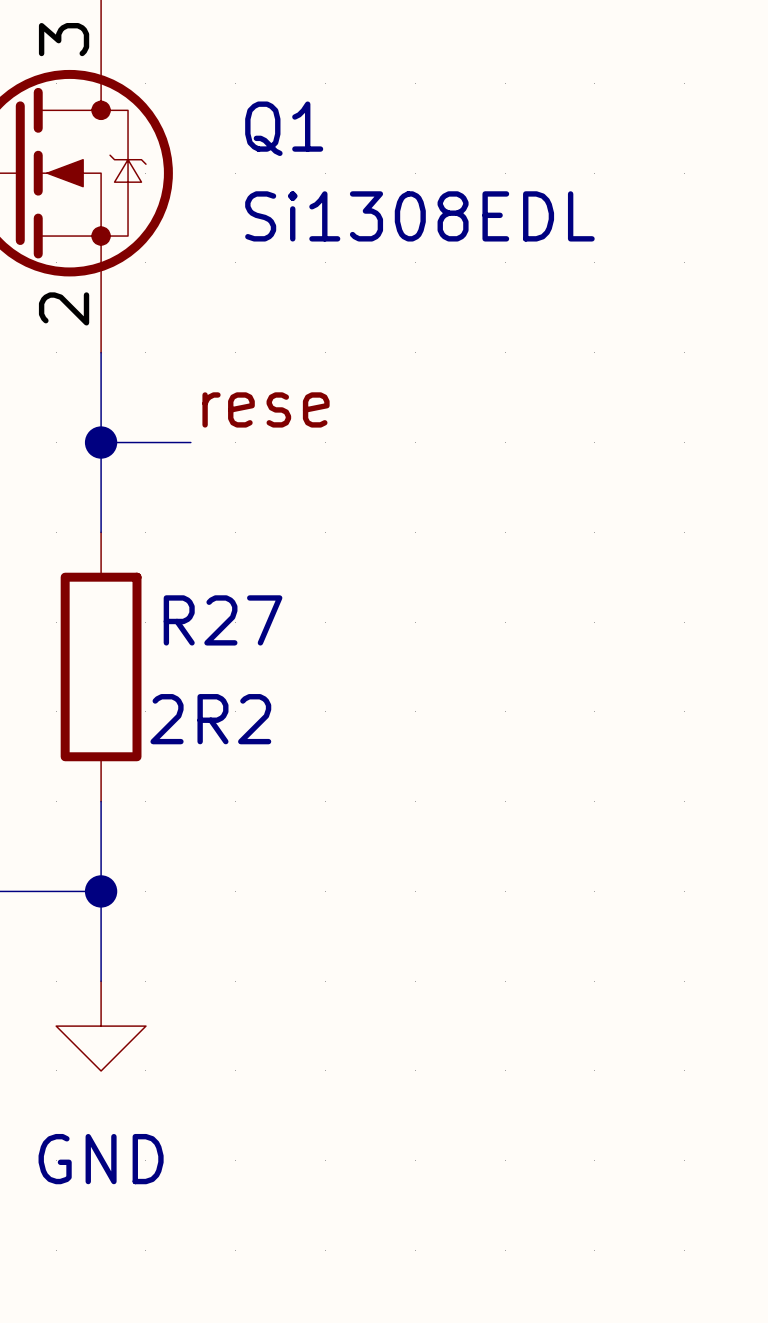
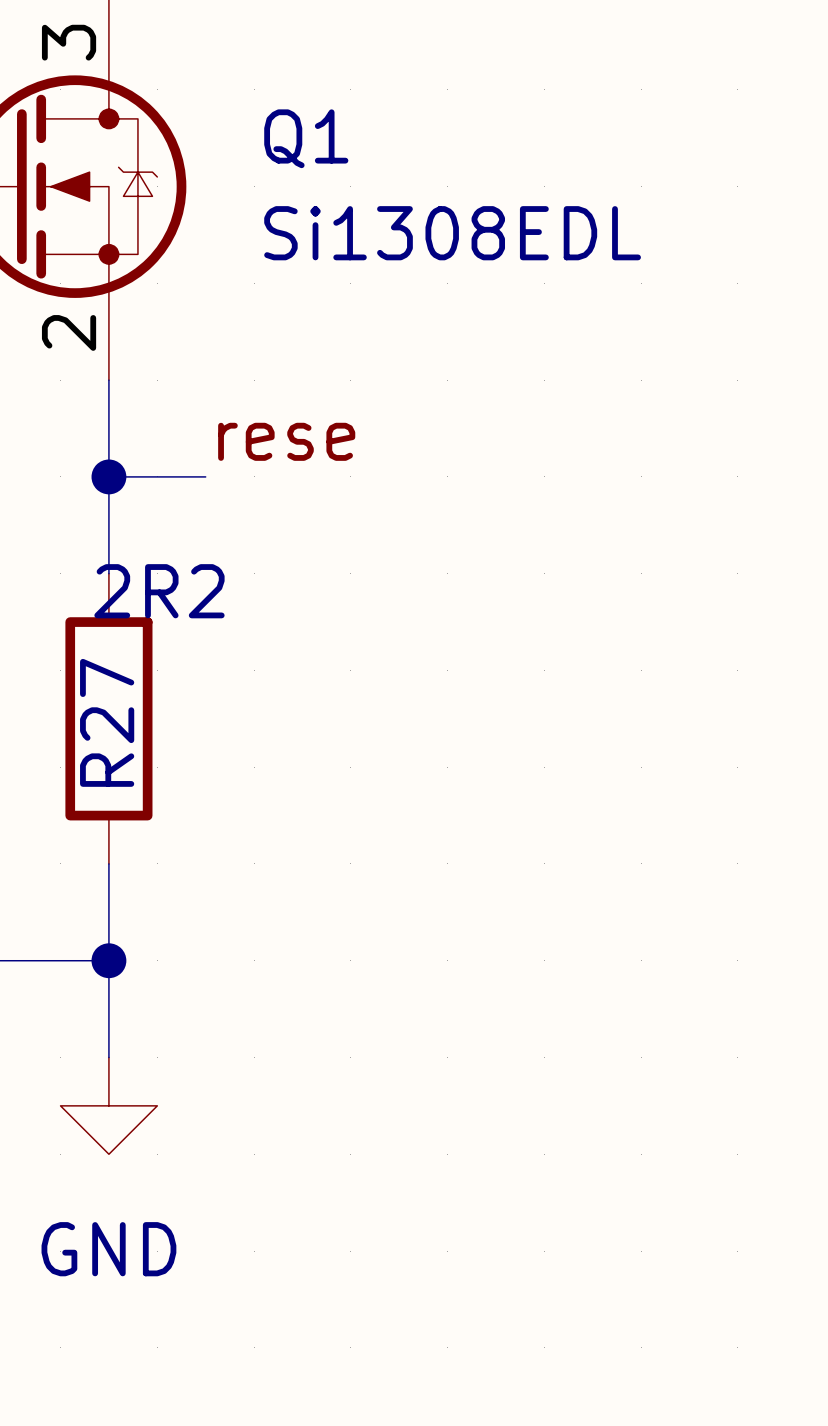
R27 name rotation: 0° (223, 620) -> 90° counterclockwise (107, 722)
R27 value position: 2R2 (210, 719) -> 2R2 (159, 591)

